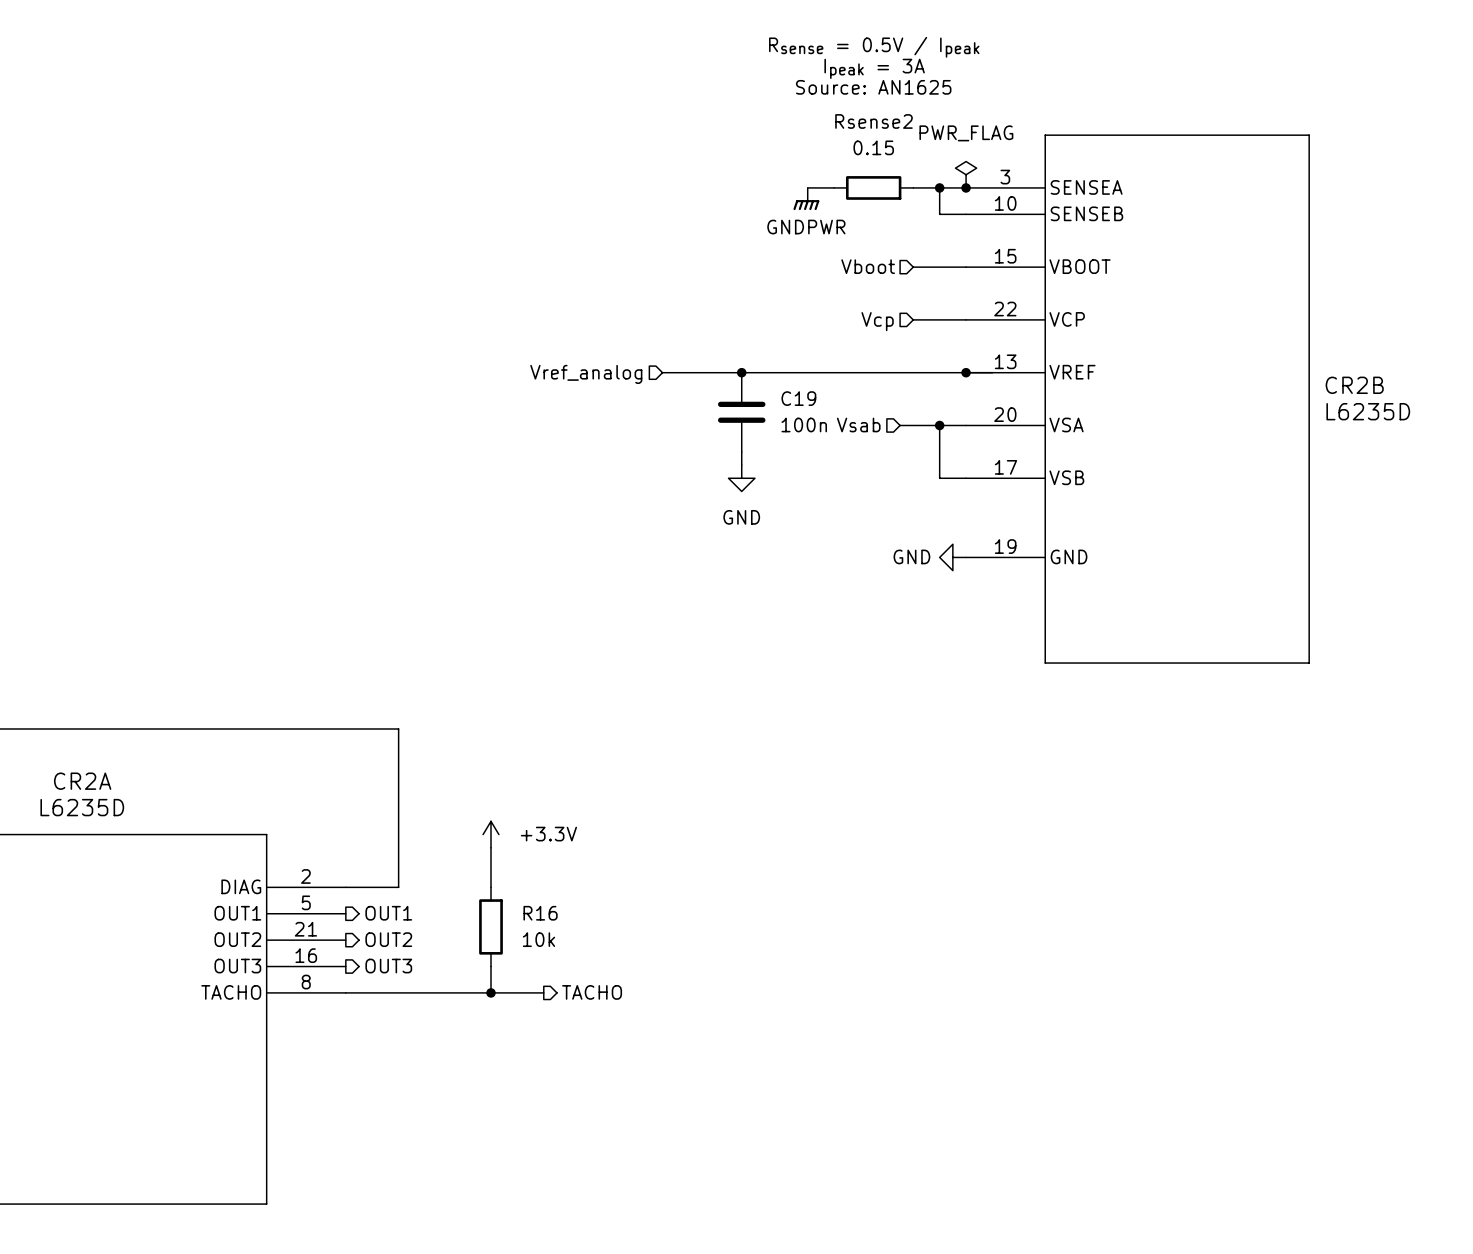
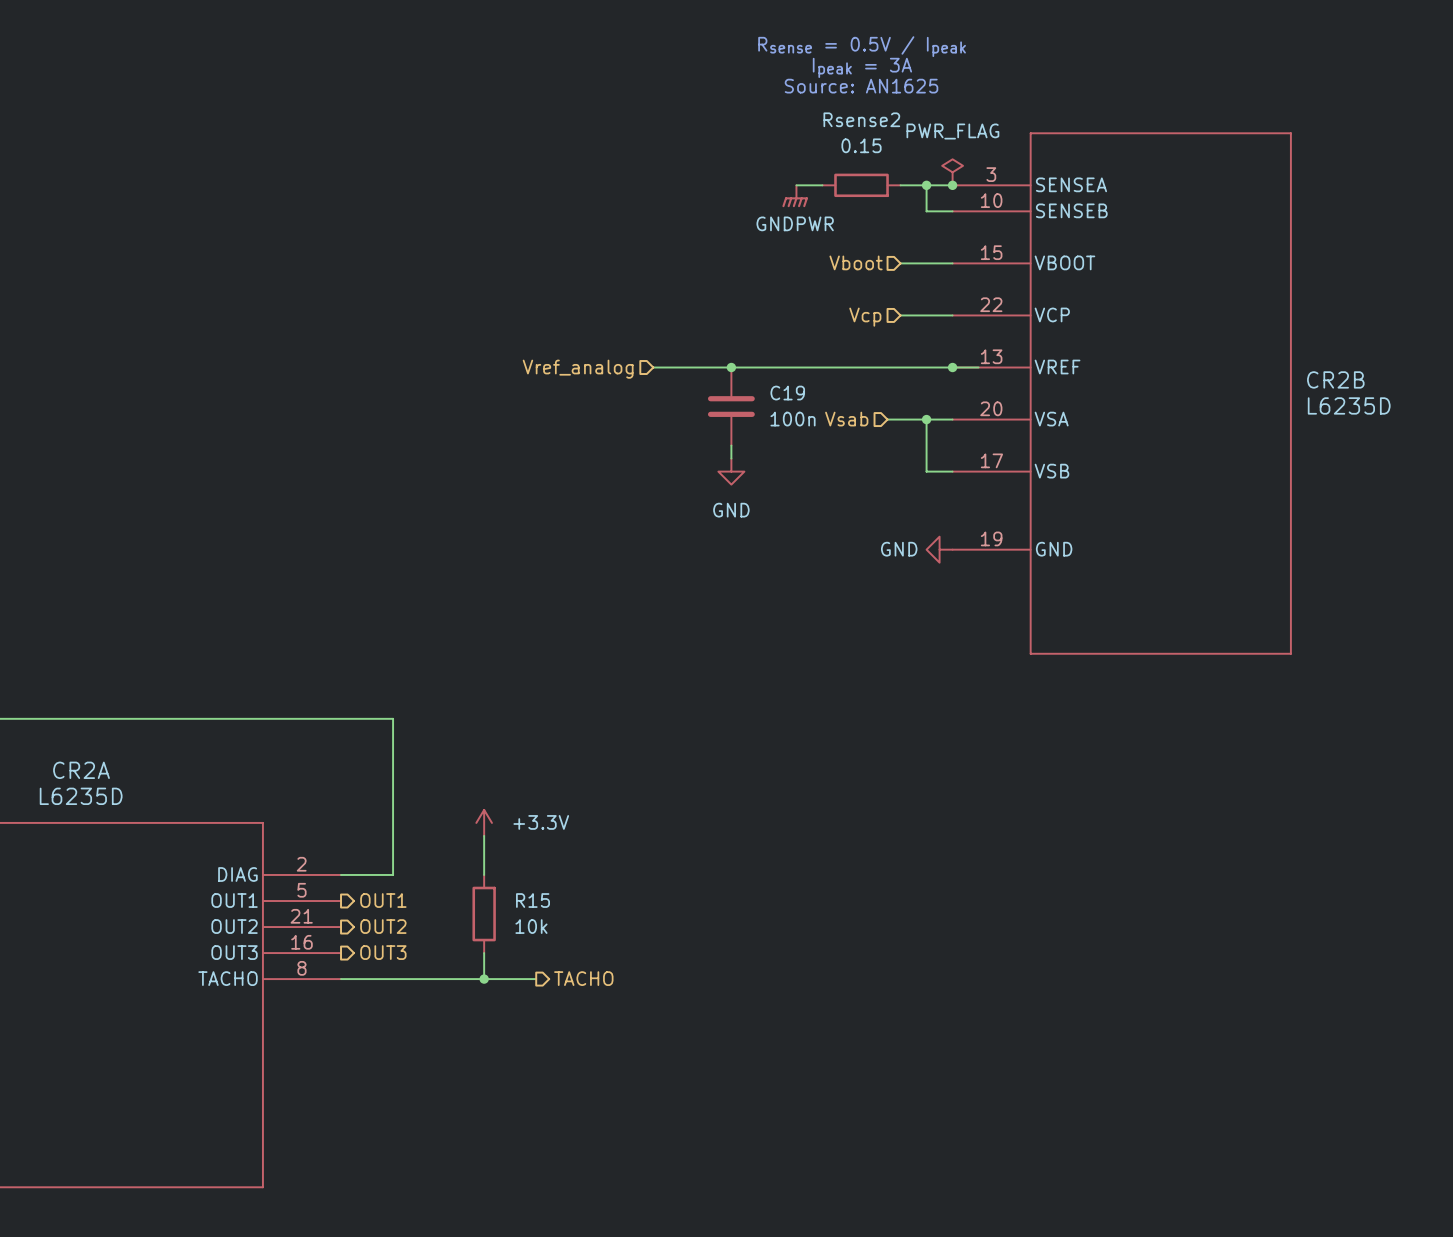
R16 name: R16 (540, 913) -> R15 (533, 900)

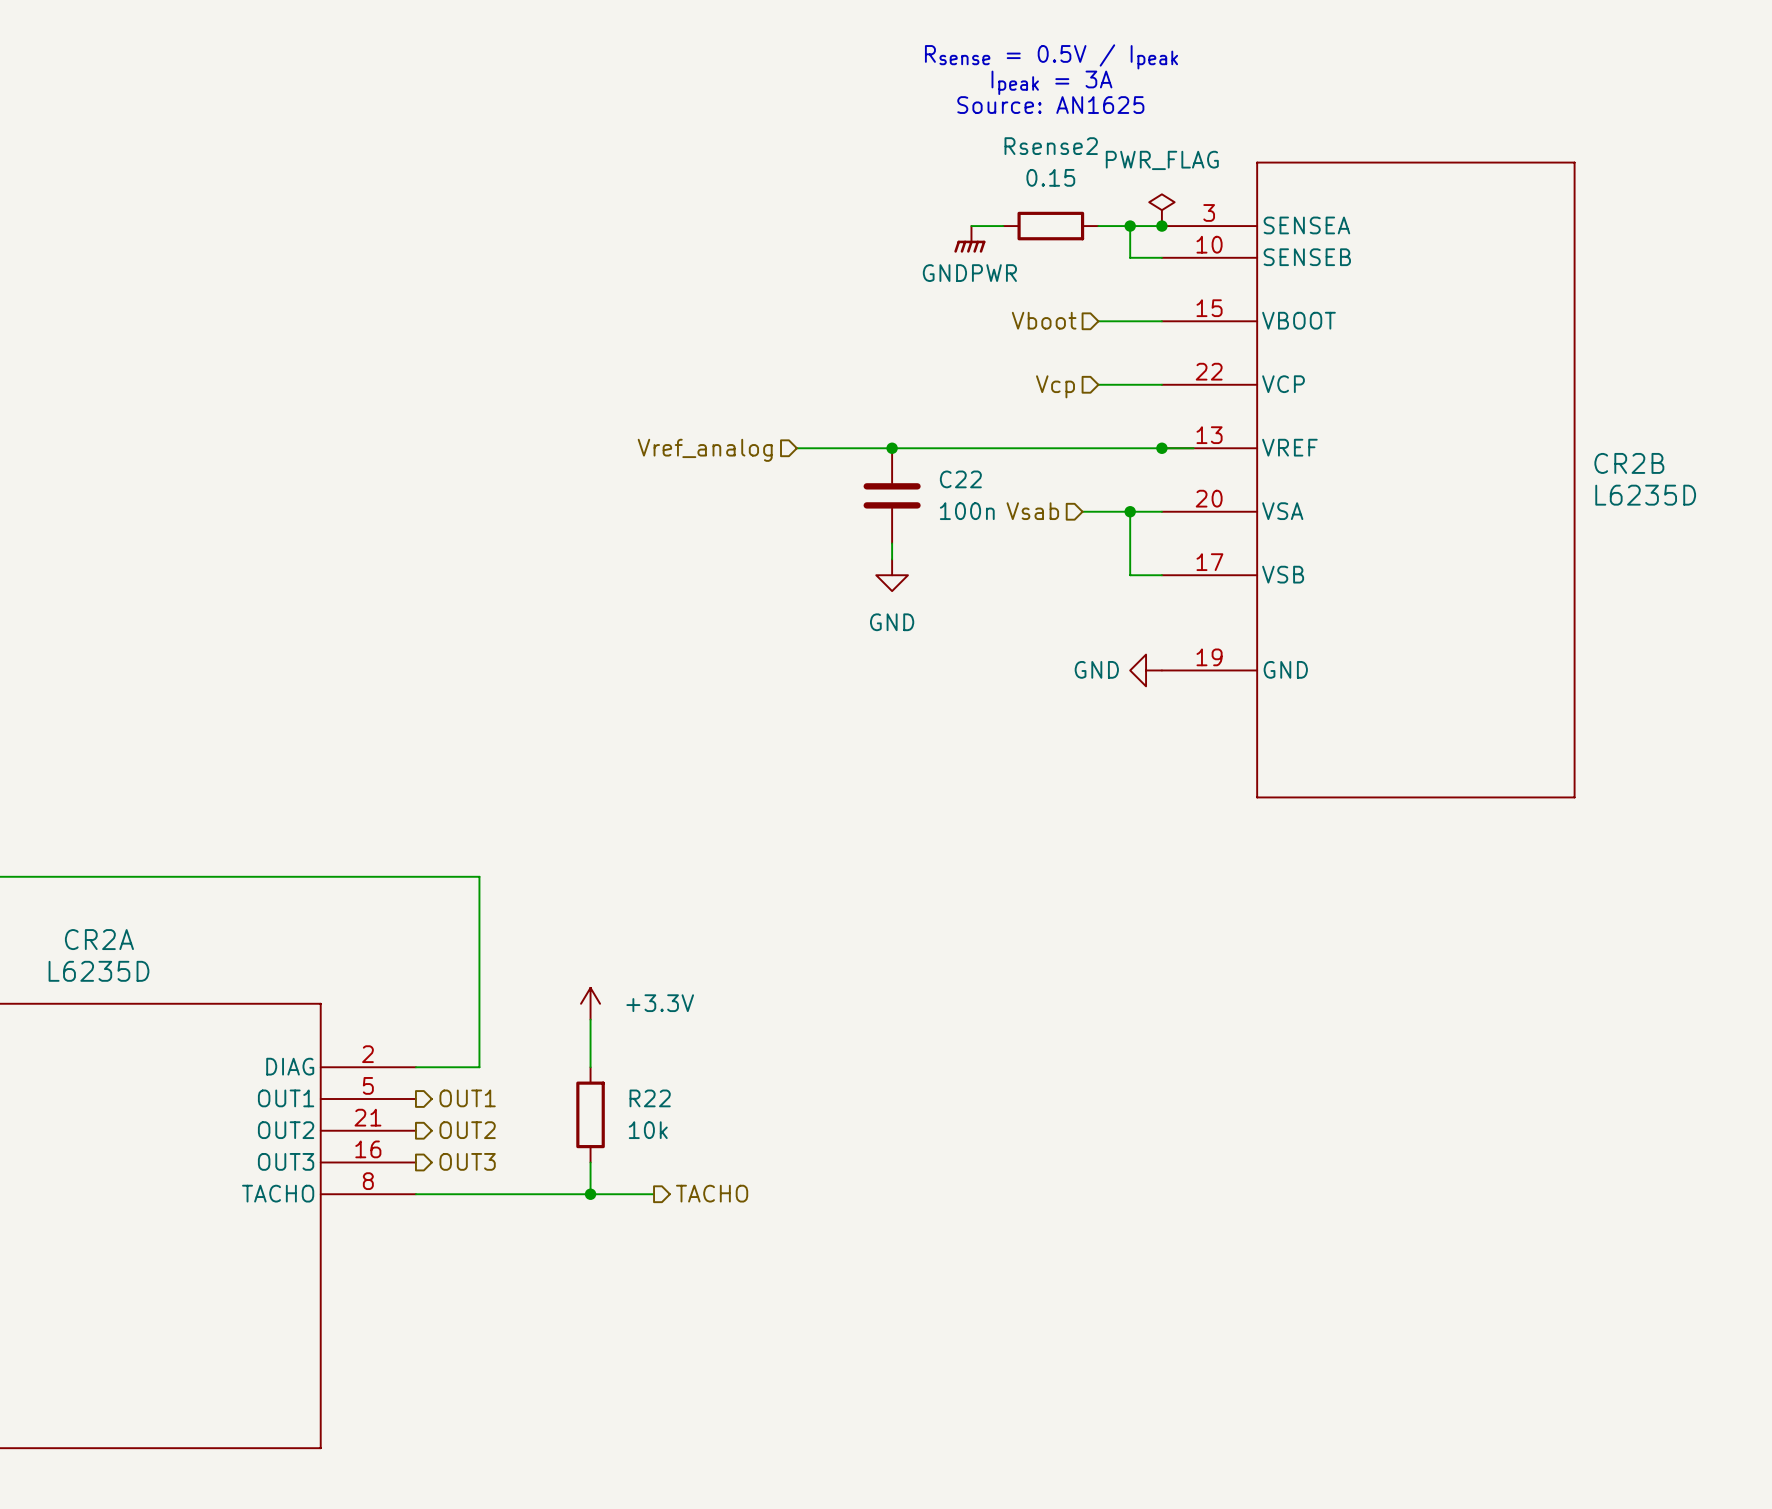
C19 name: C19 (787, 393) -> C22 (960, 479)
R15 name: R15 (533, 900) -> R22 (650, 1098)

